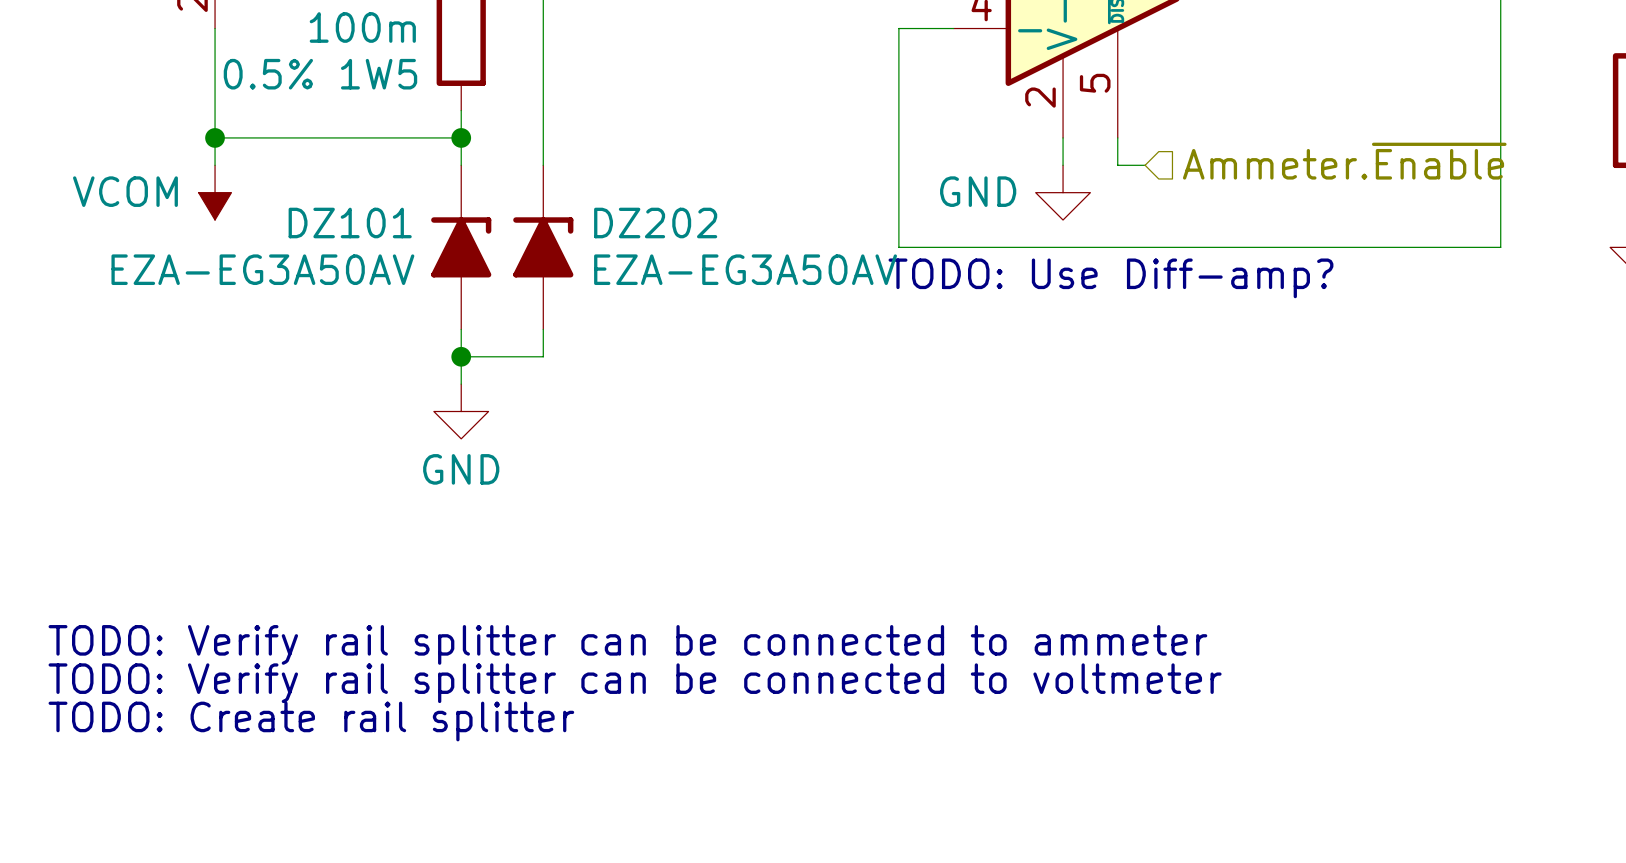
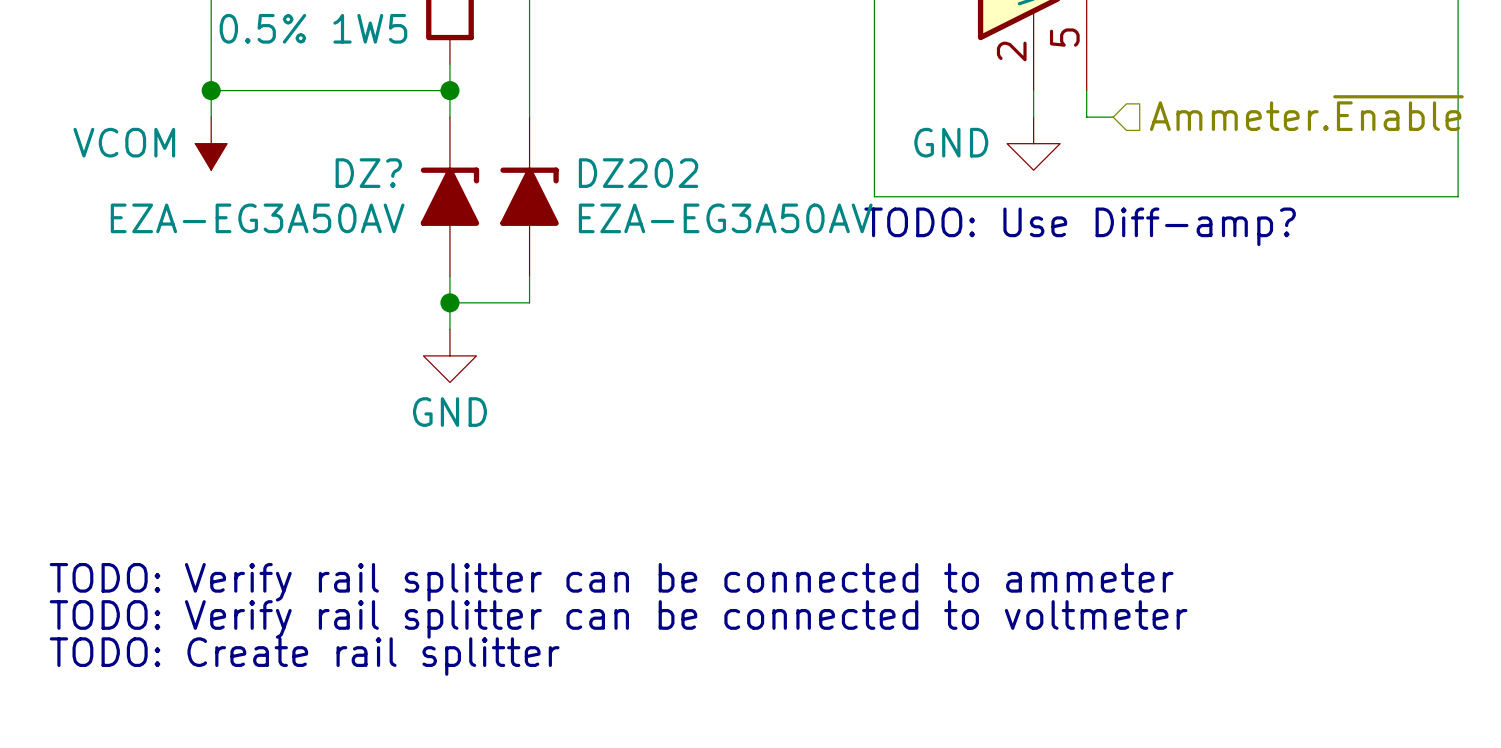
DZ101 name: DZ101 (350, 223) -> DZ? (368, 173)

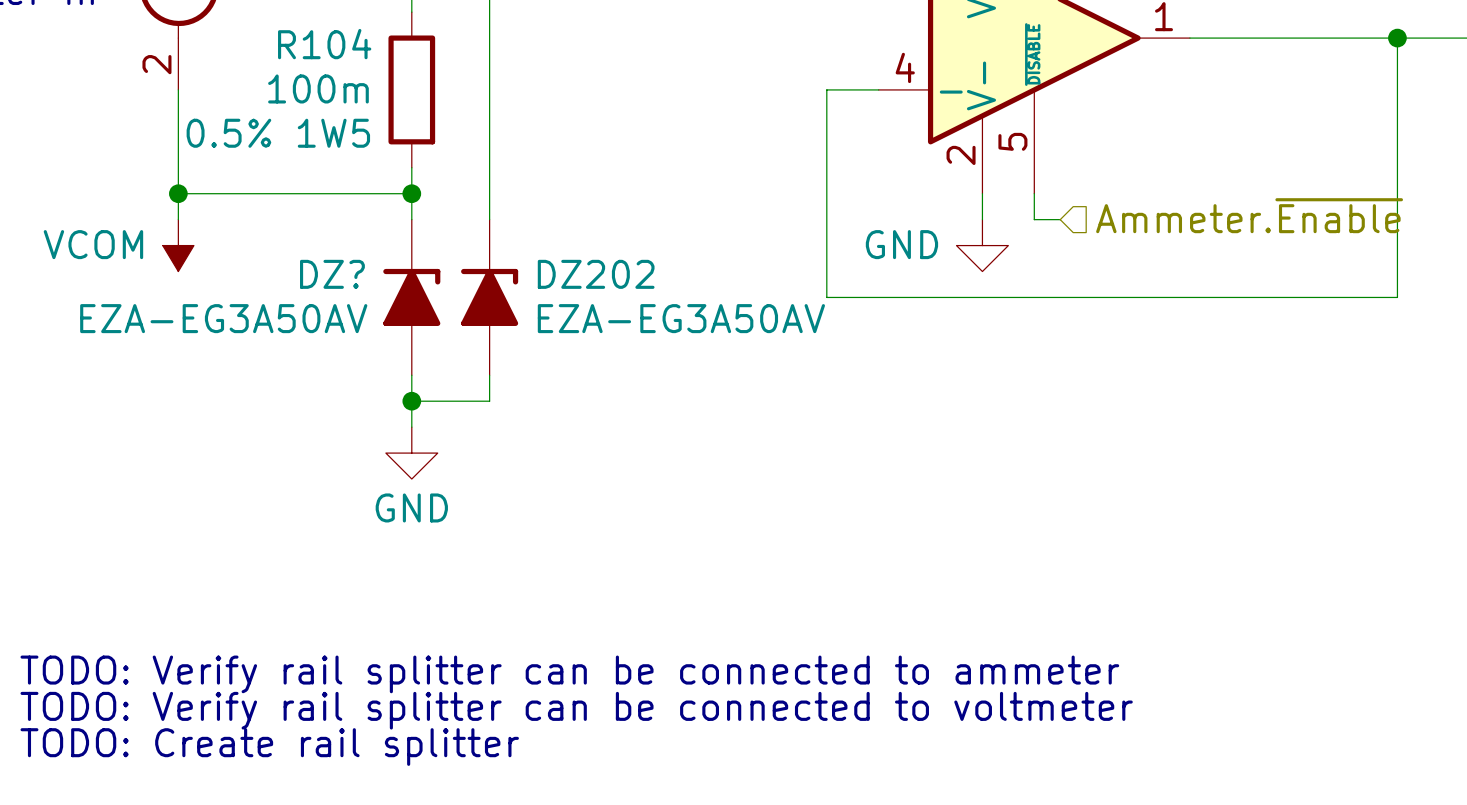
text: TODO: Use Diff-amp? (1080, 226) -> none

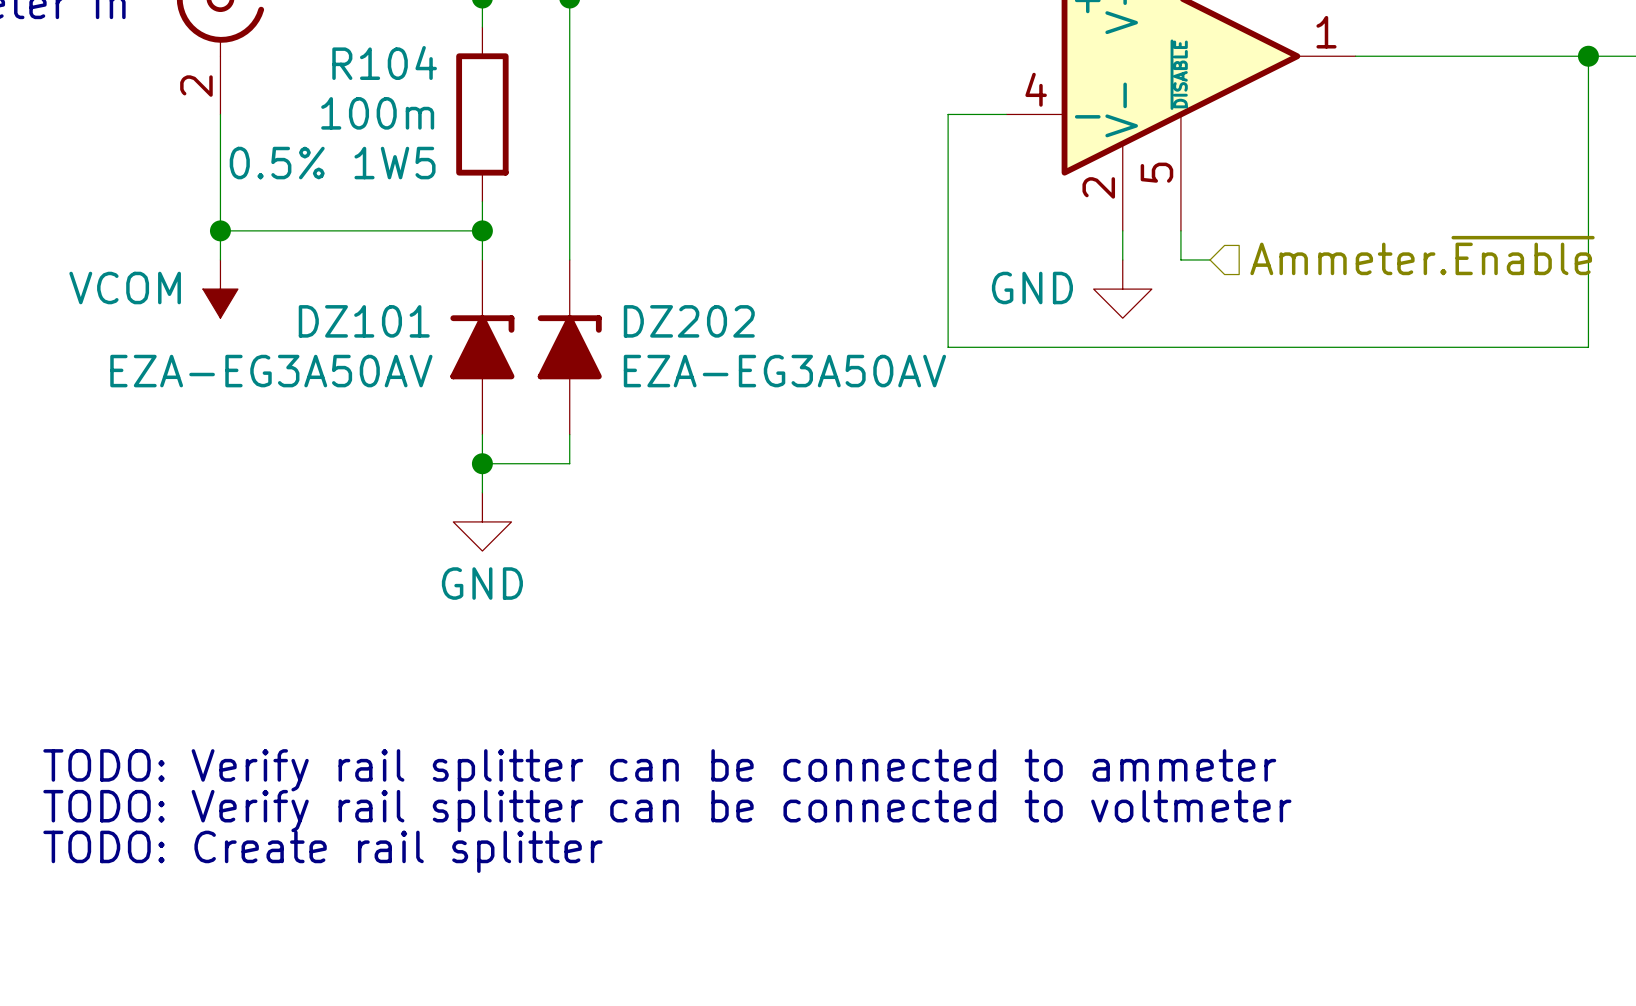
DZ? name: DZ? (332, 274) -> DZ101 (364, 321)

